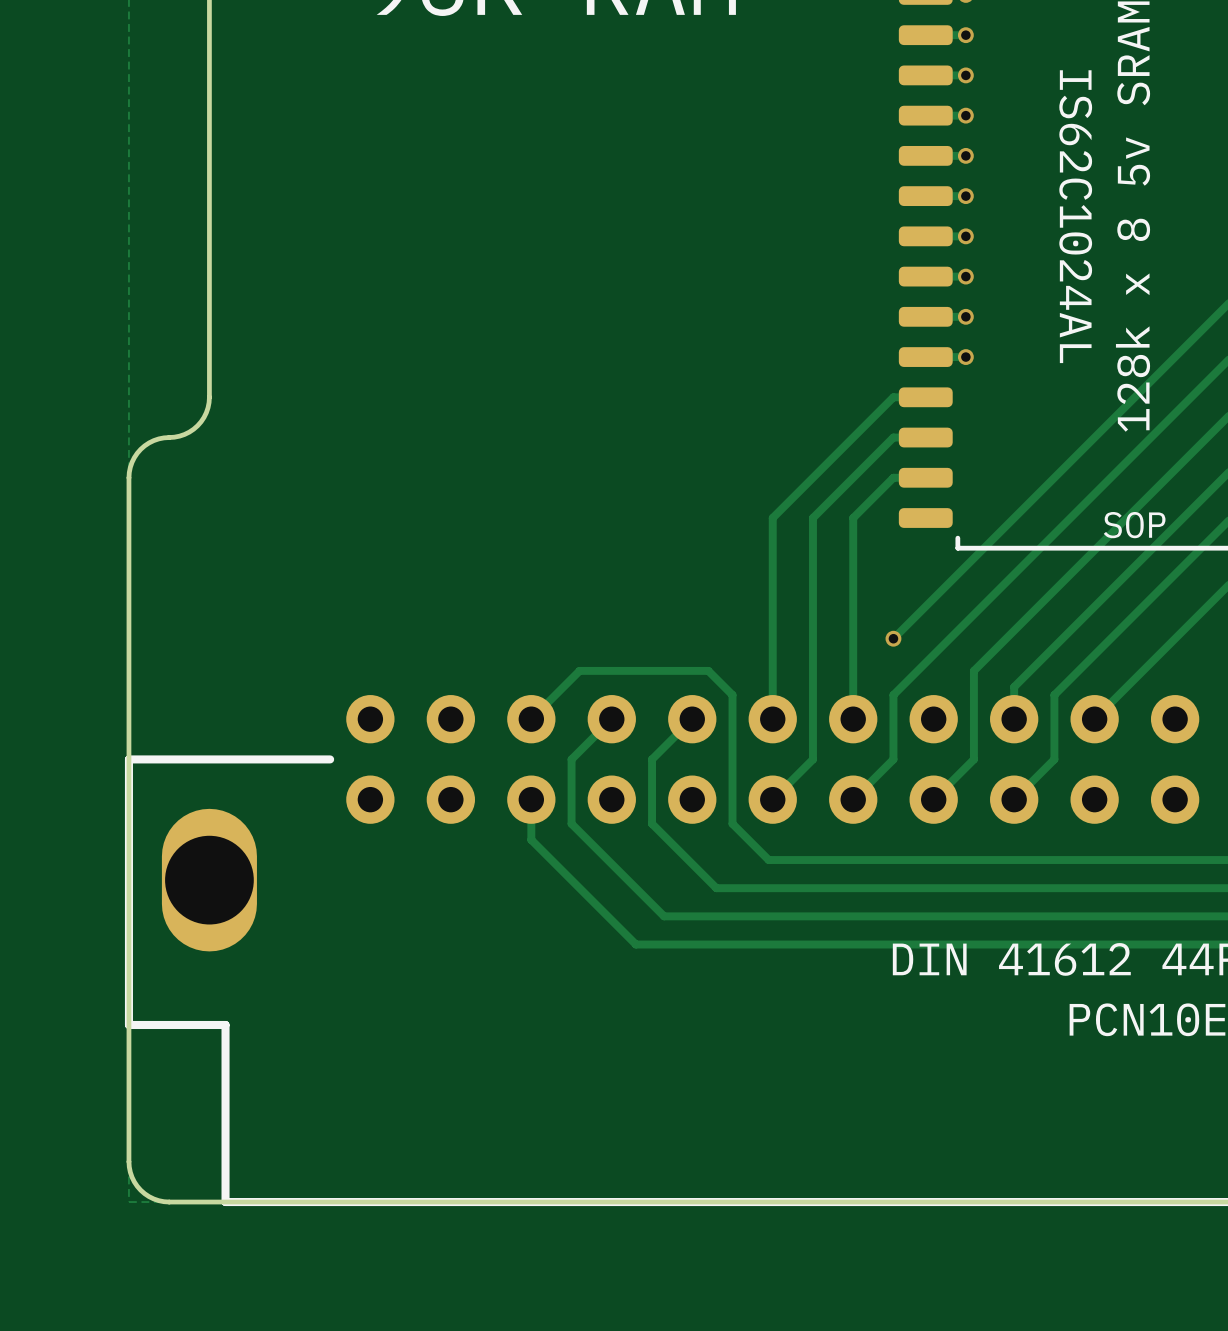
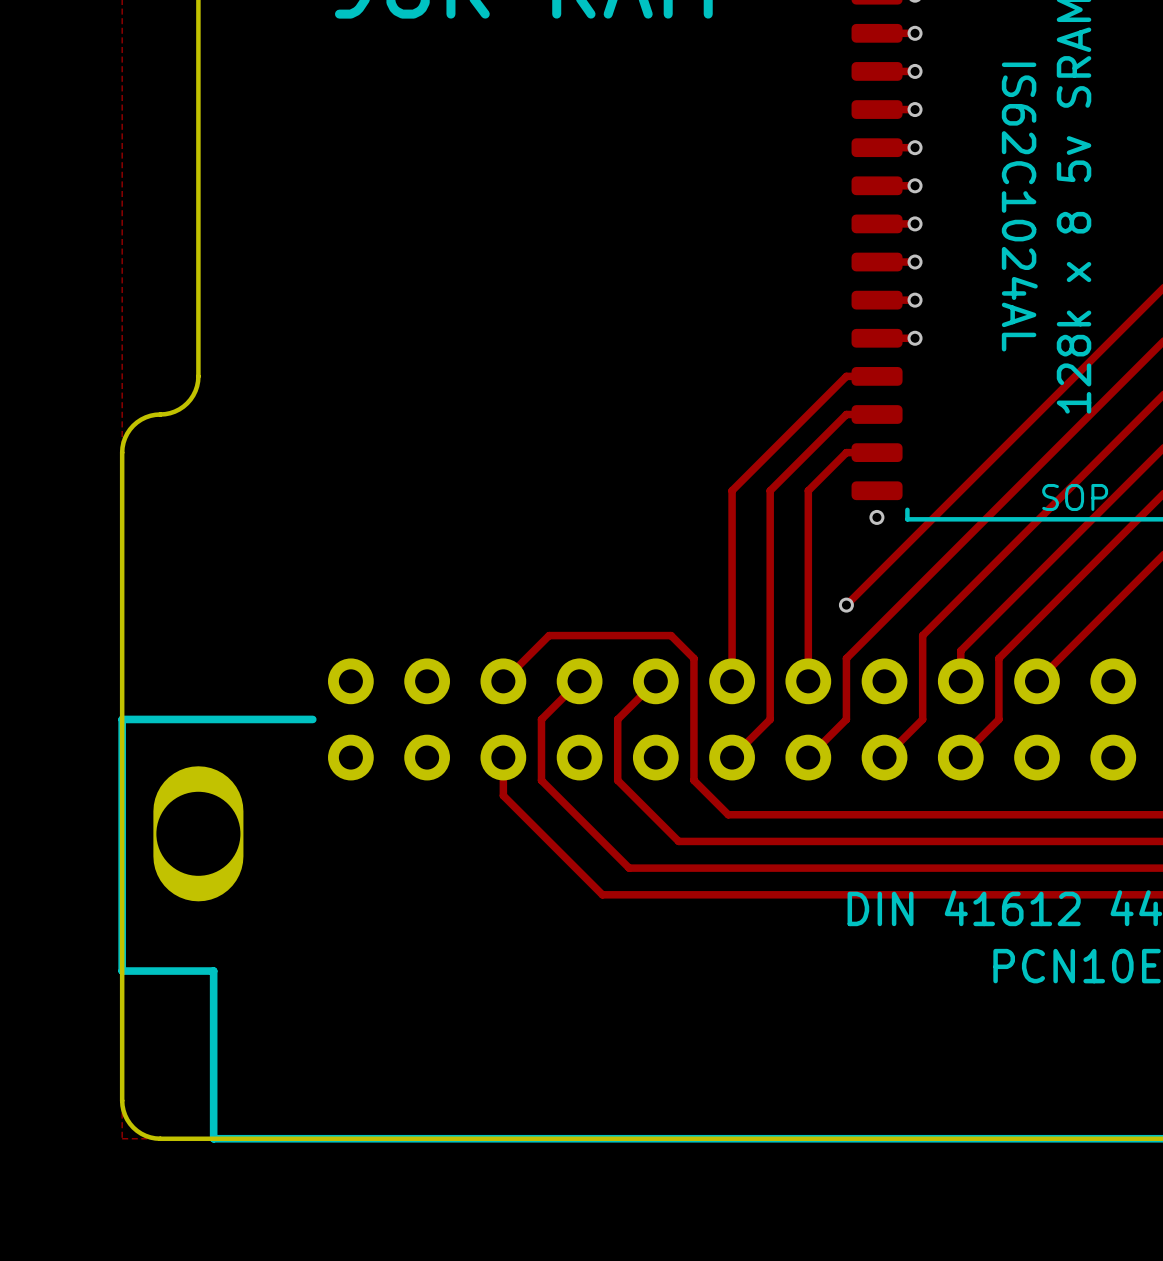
via: none -> (876, 517)

